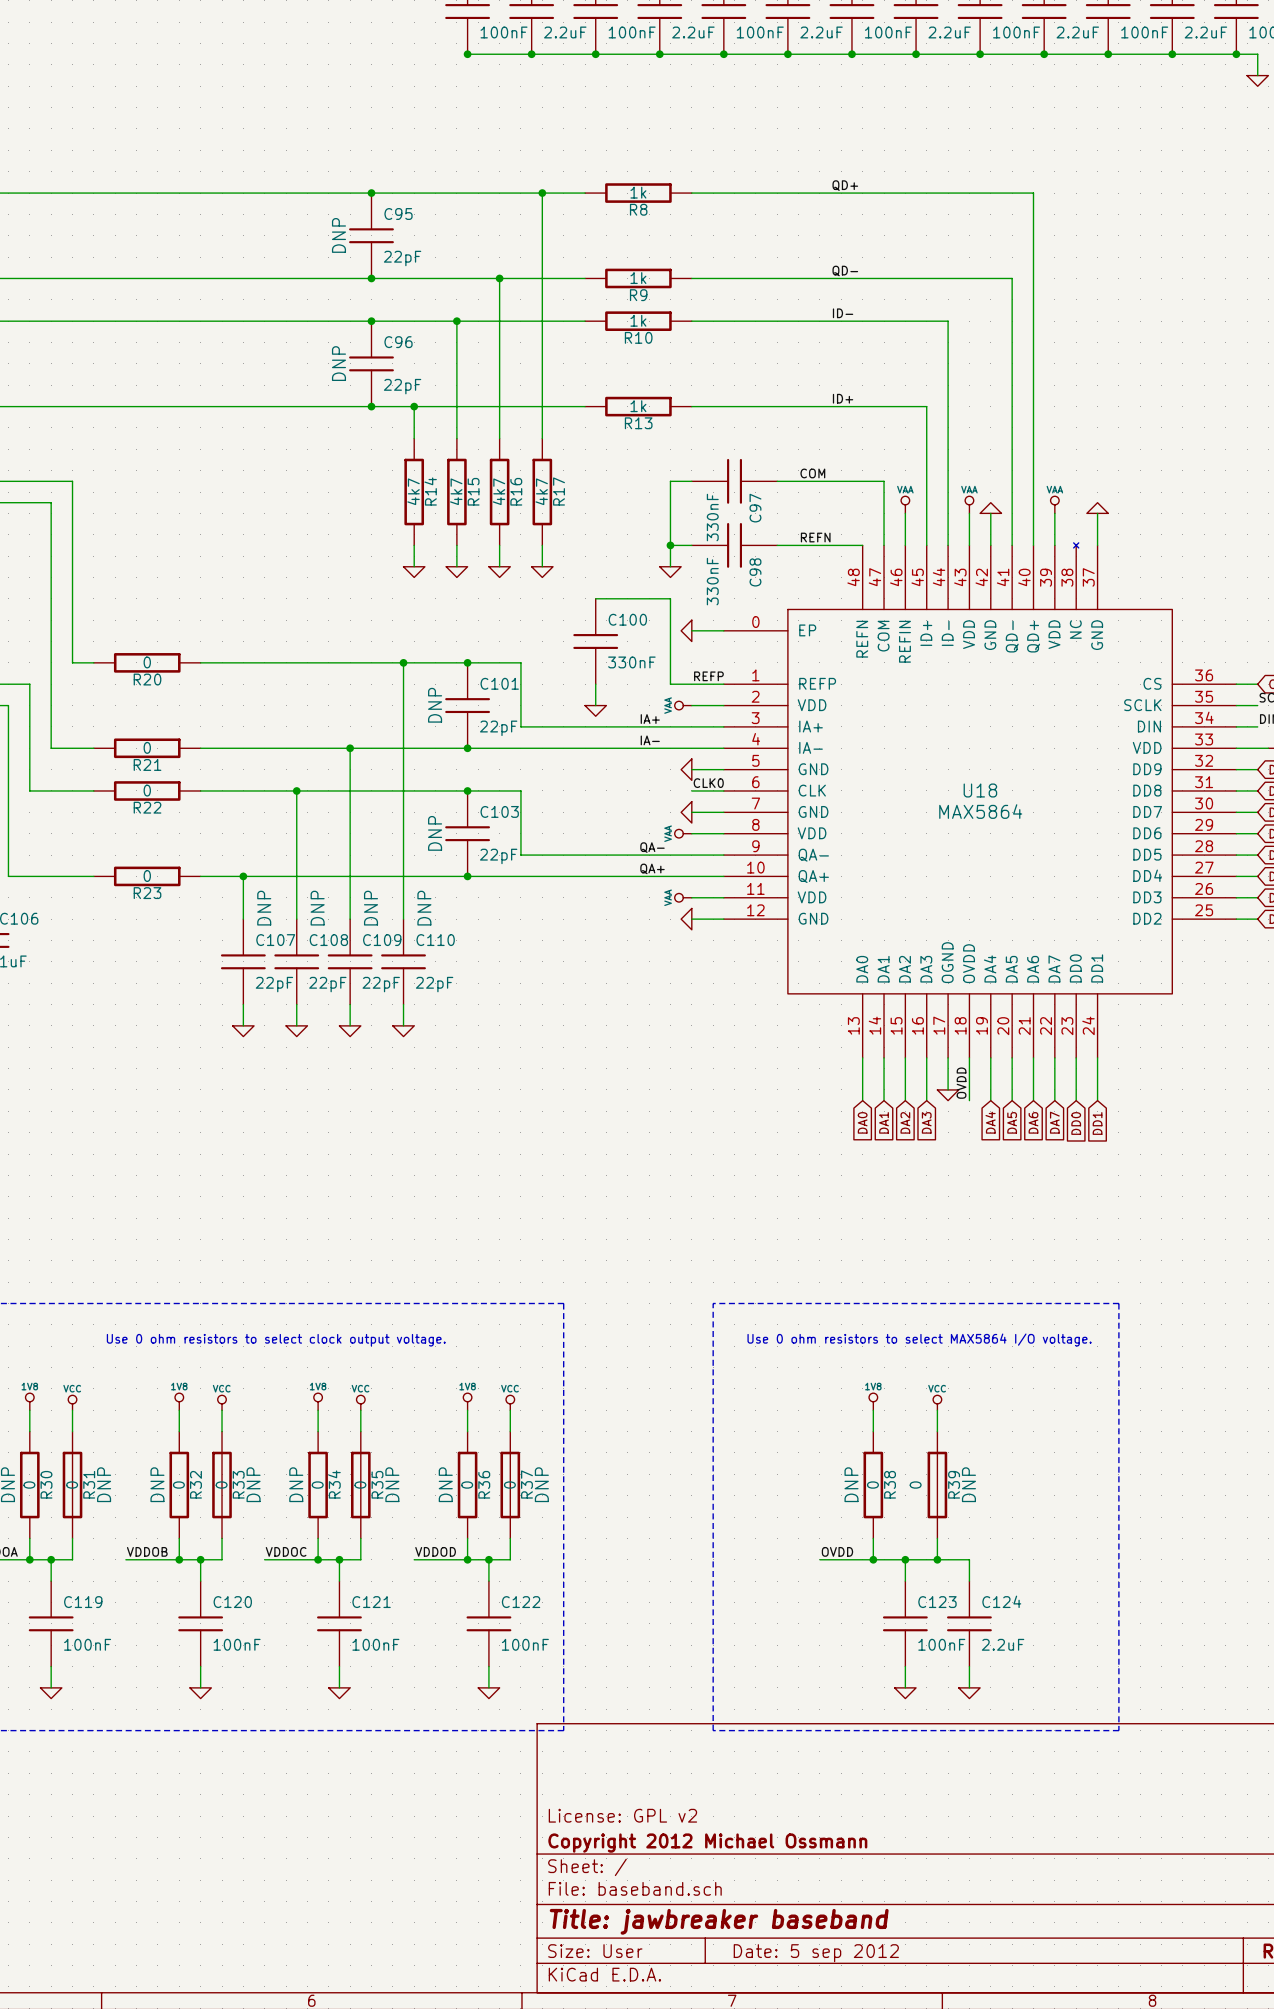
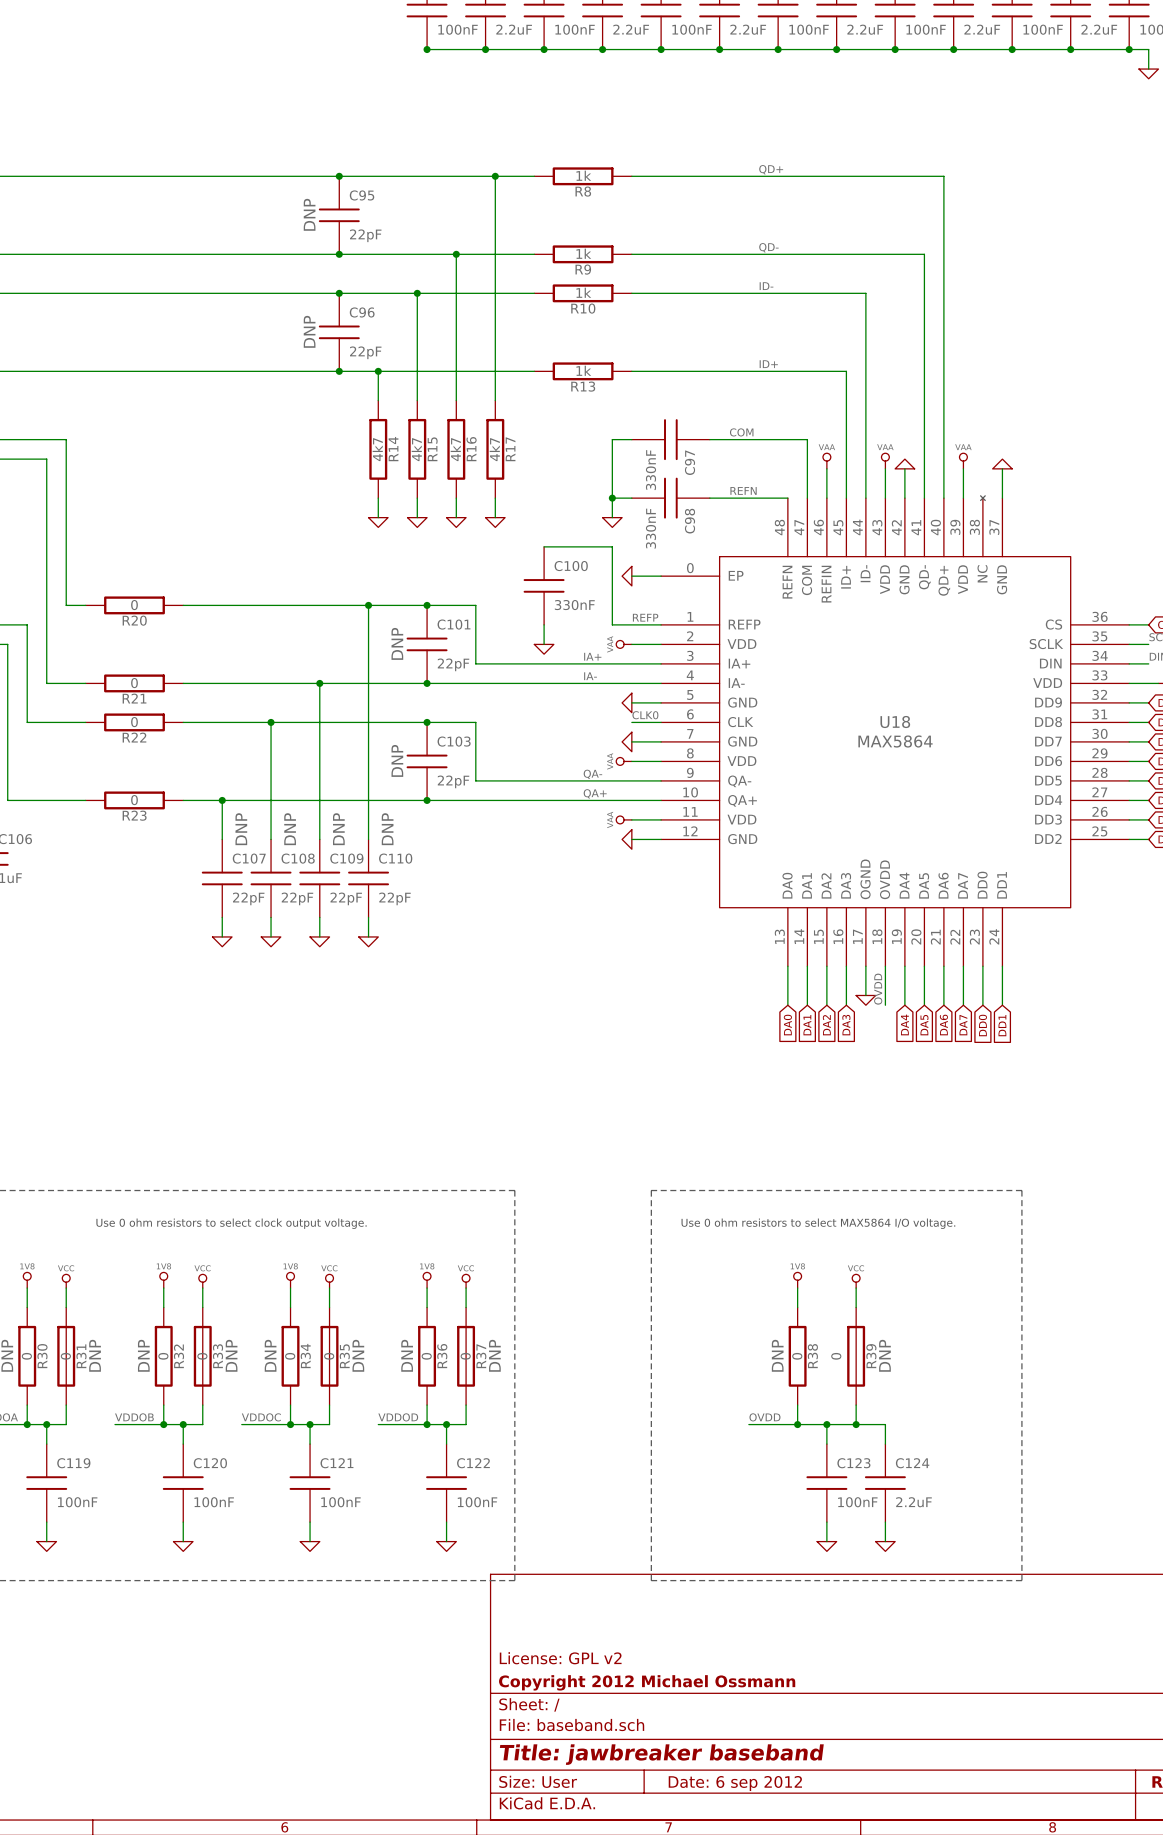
title block: Date: 5 sep 2012 (816, 1953) -> Date: 6 sep 2012 (735, 1783)

